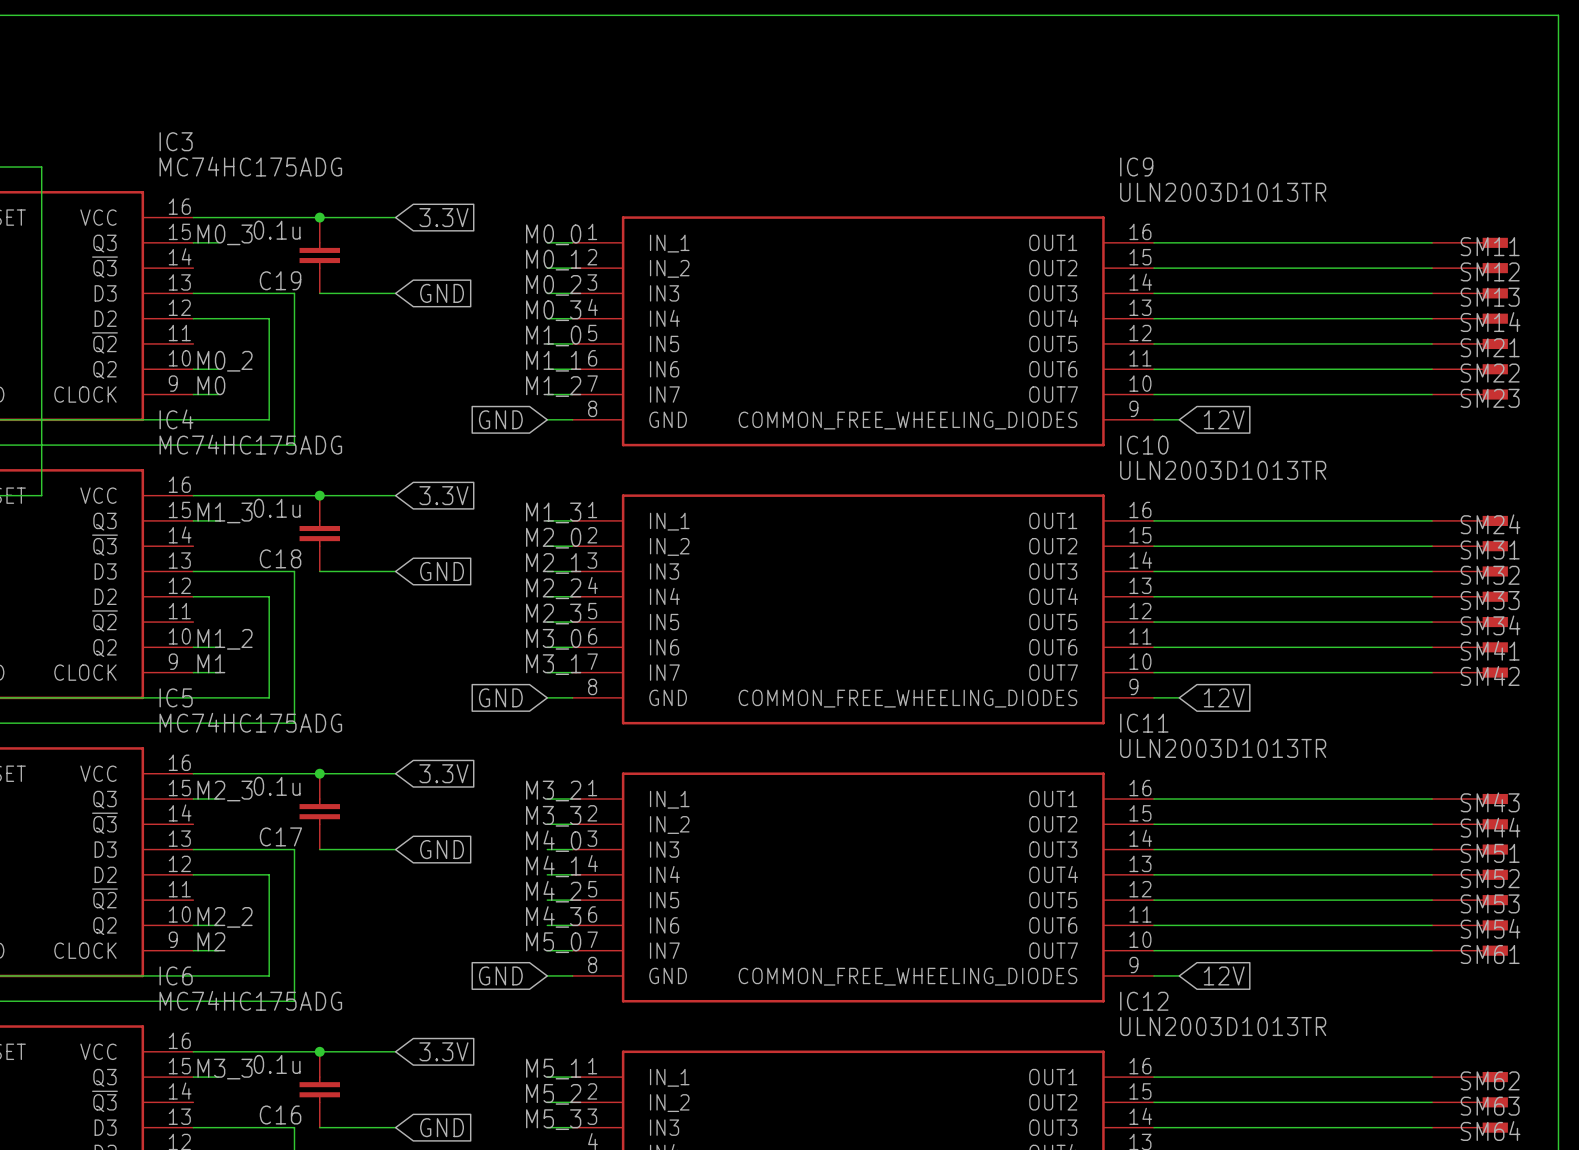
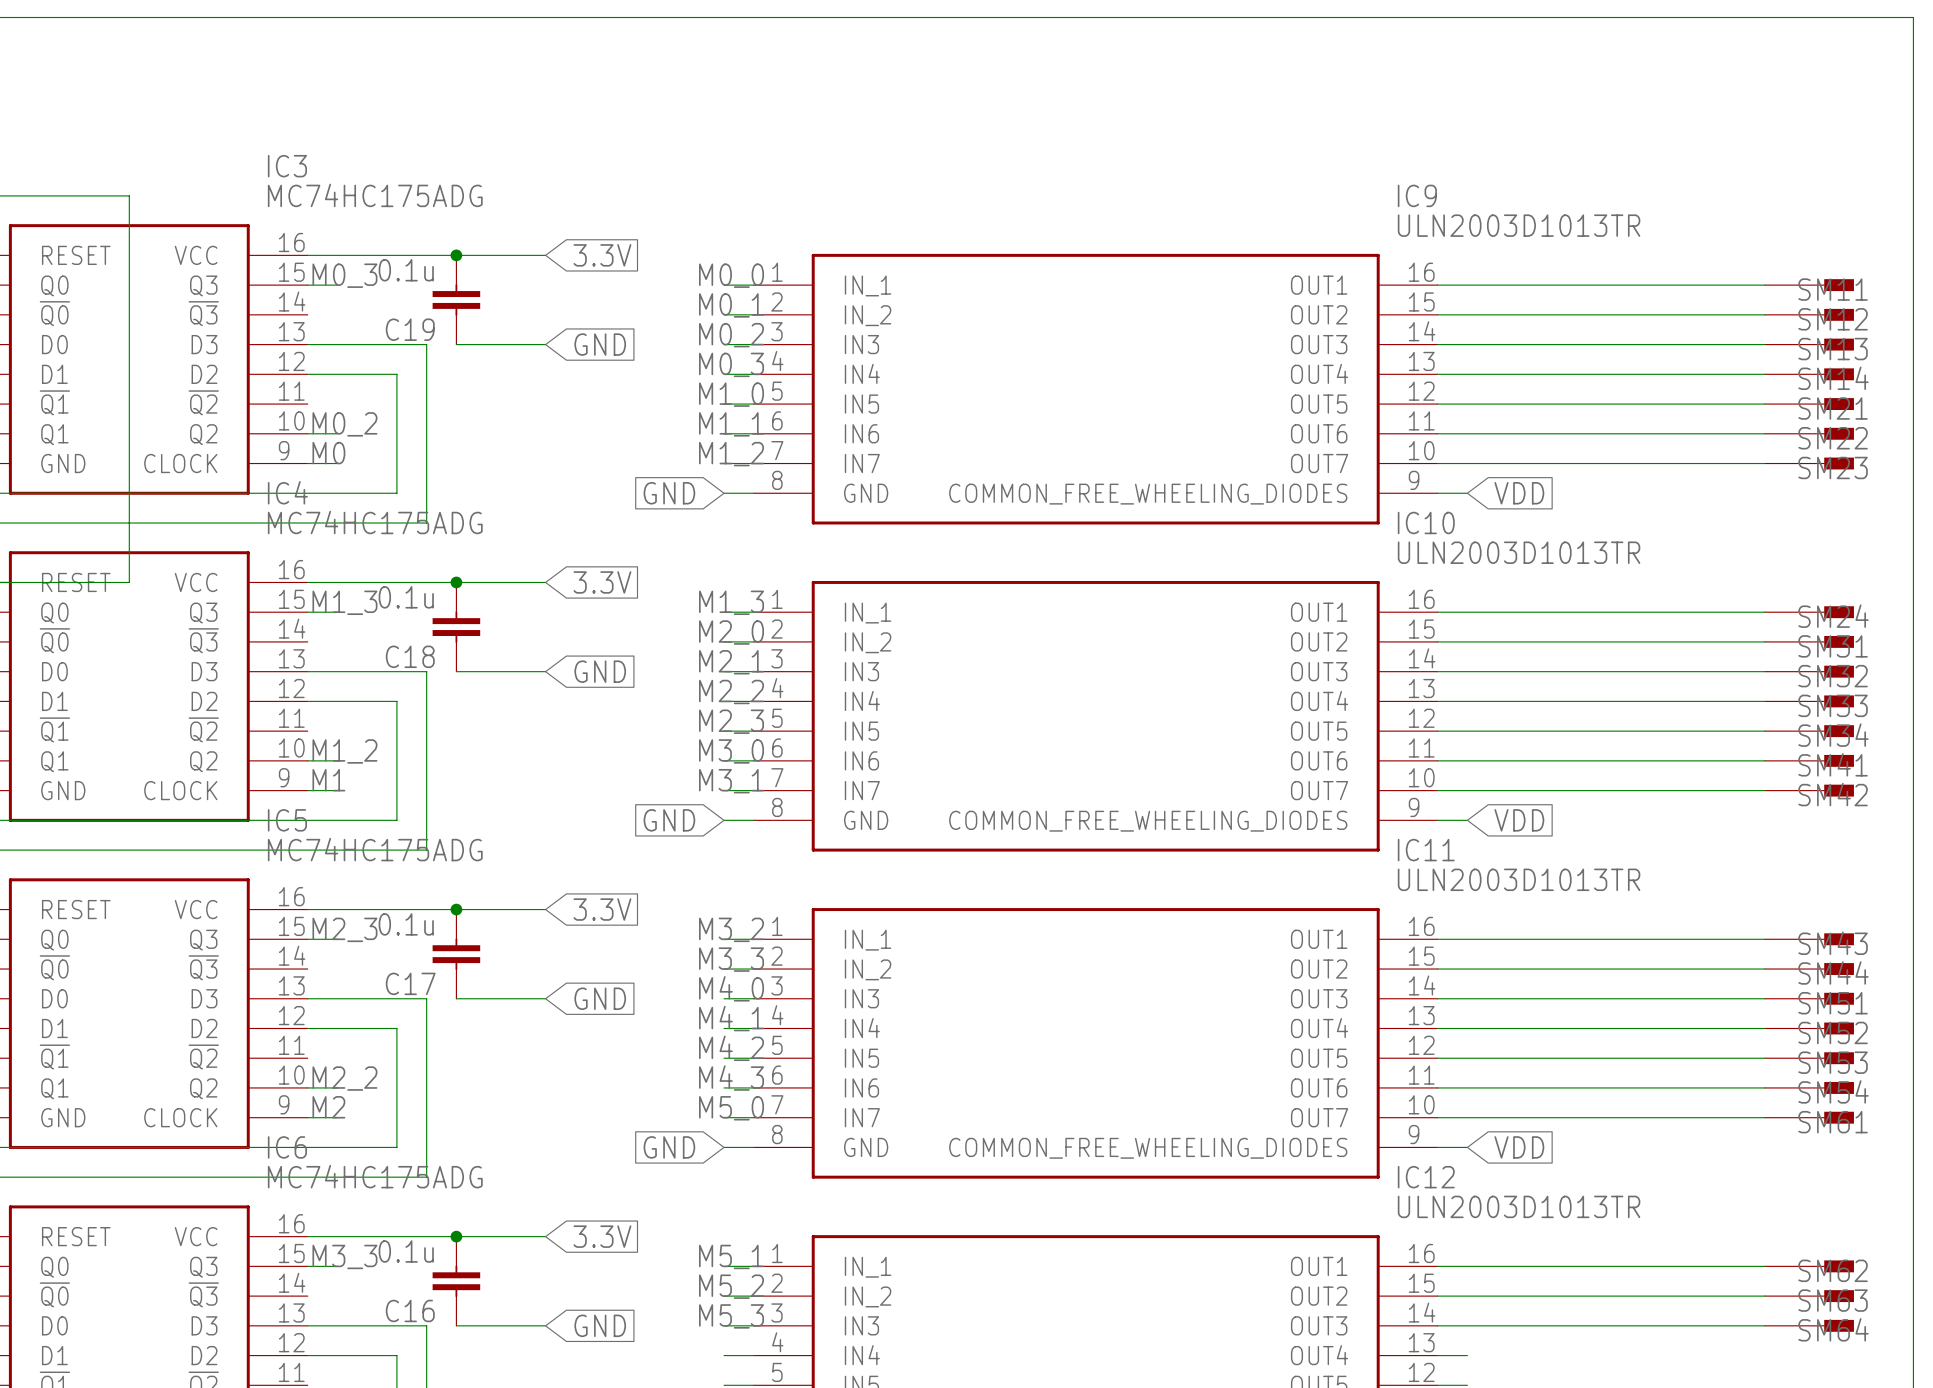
global label: 12V (1224, 419) -> VDD (1519, 493)
global label: 12V (1224, 697) -> VDD (1519, 820)
global label: 12V (1224, 975) -> VDD (1519, 1147)

